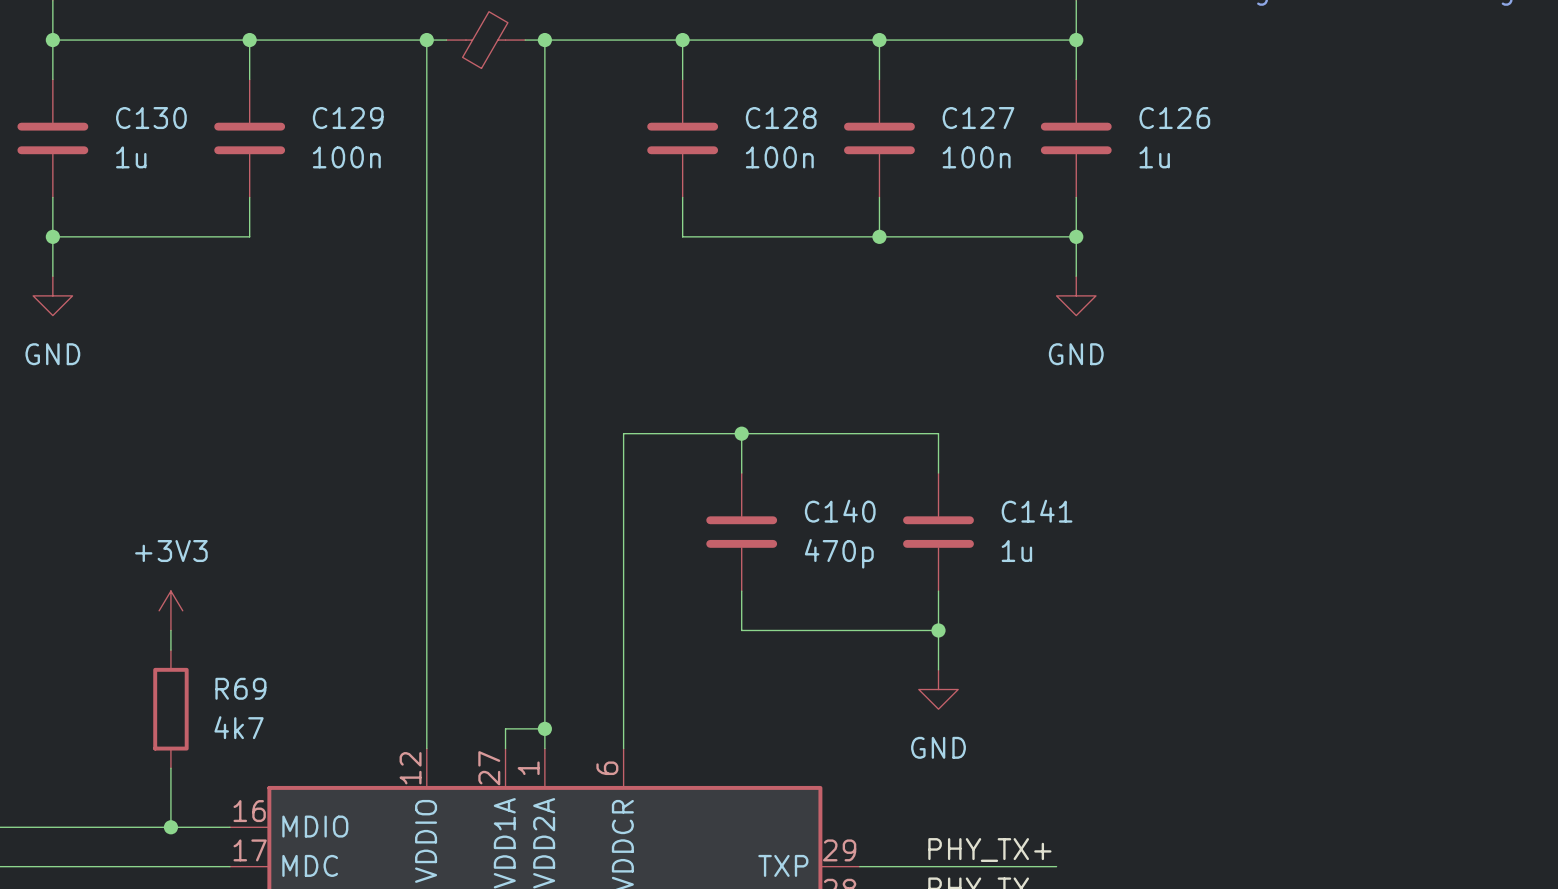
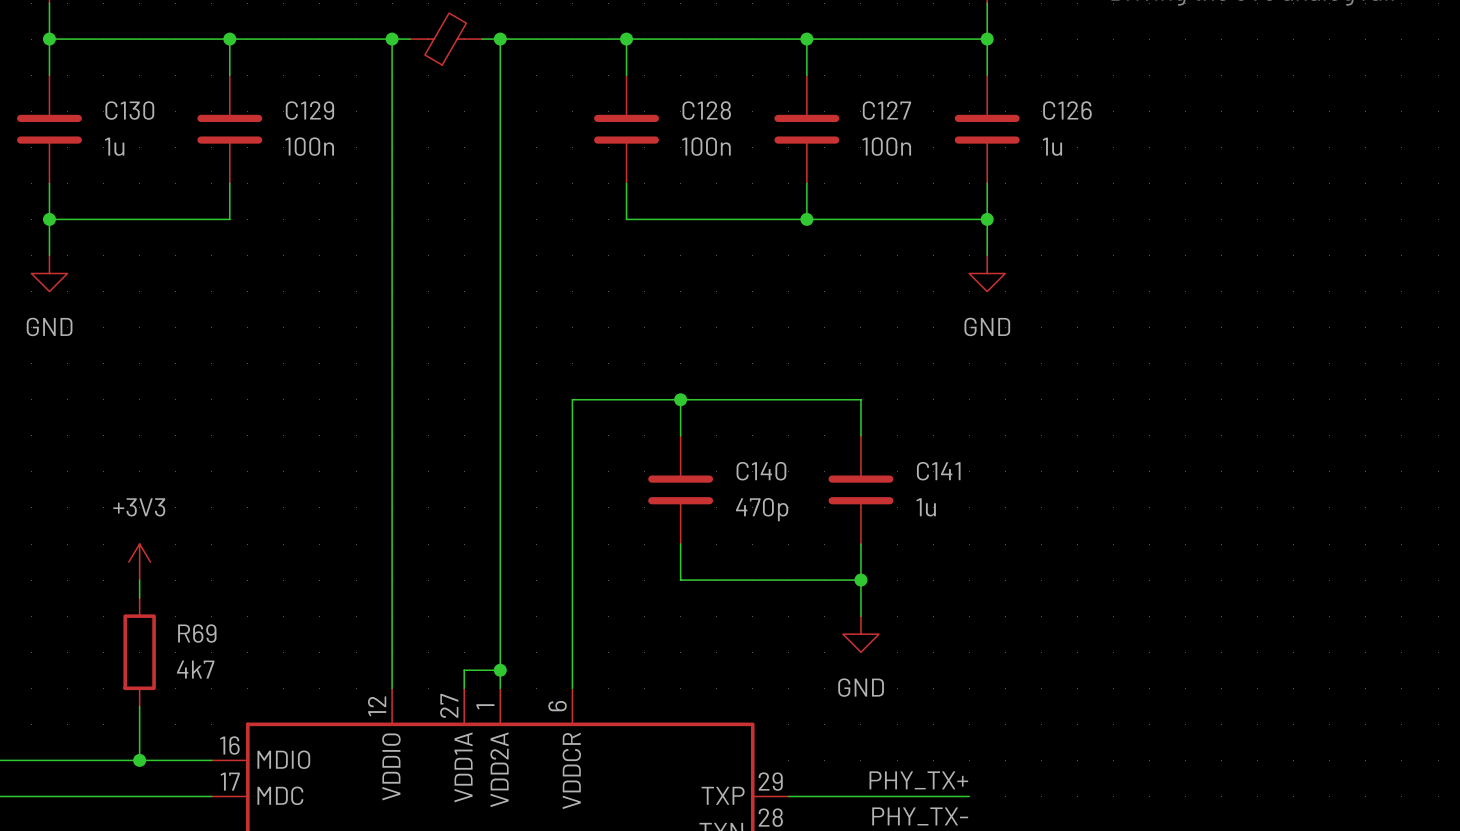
power symbol position: +3V3 (170, 610) -> +3V3 (139, 562)
wire: (170, 630) (170, 650) -> (139, 580) (139, 598)
R69 position: (170, 709) -> (139, 652)
wire: (170, 768) (170, 827) -> (139, 706) (139, 760)
junction position: (170, 827) -> (139, 760)

